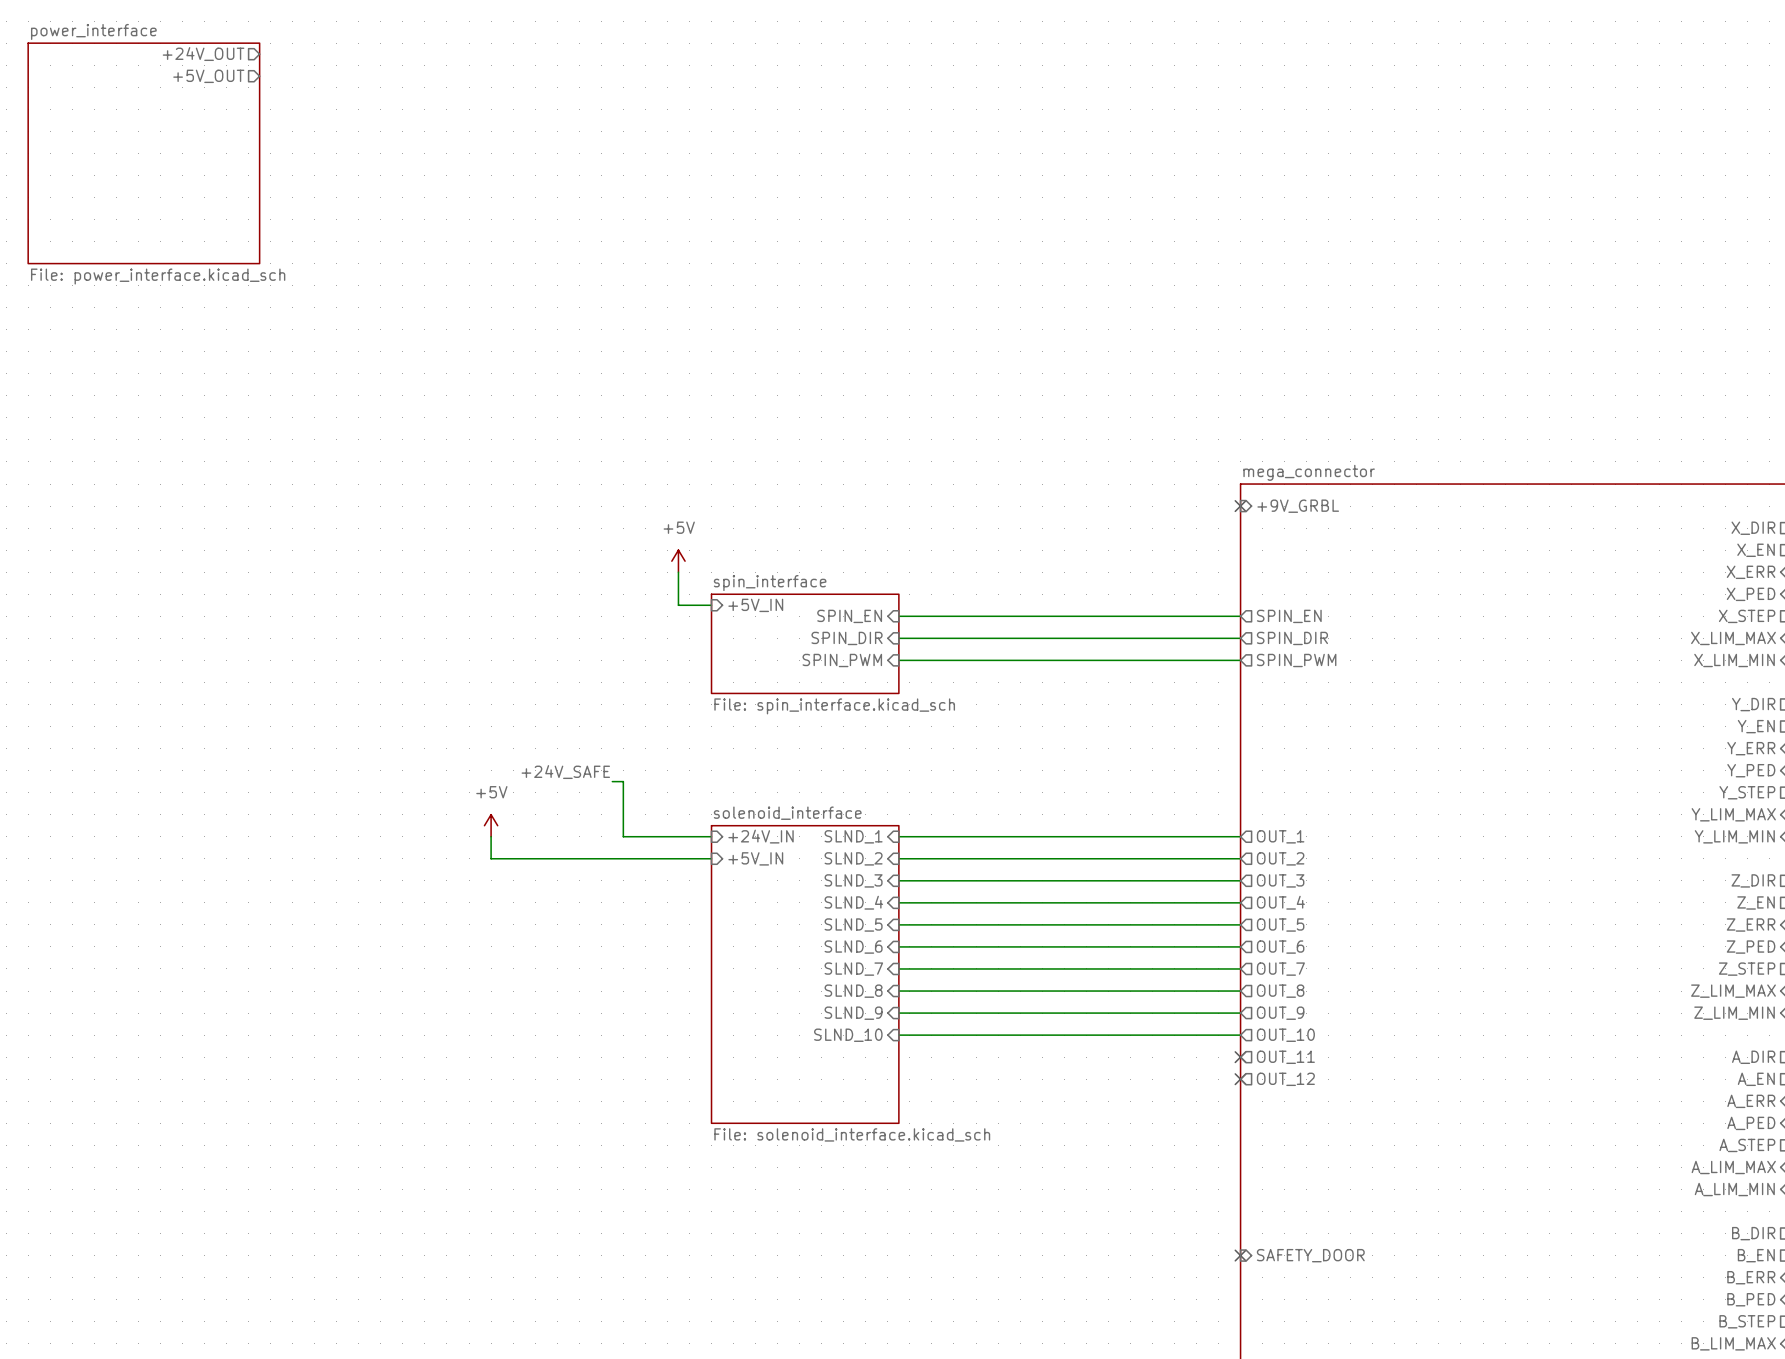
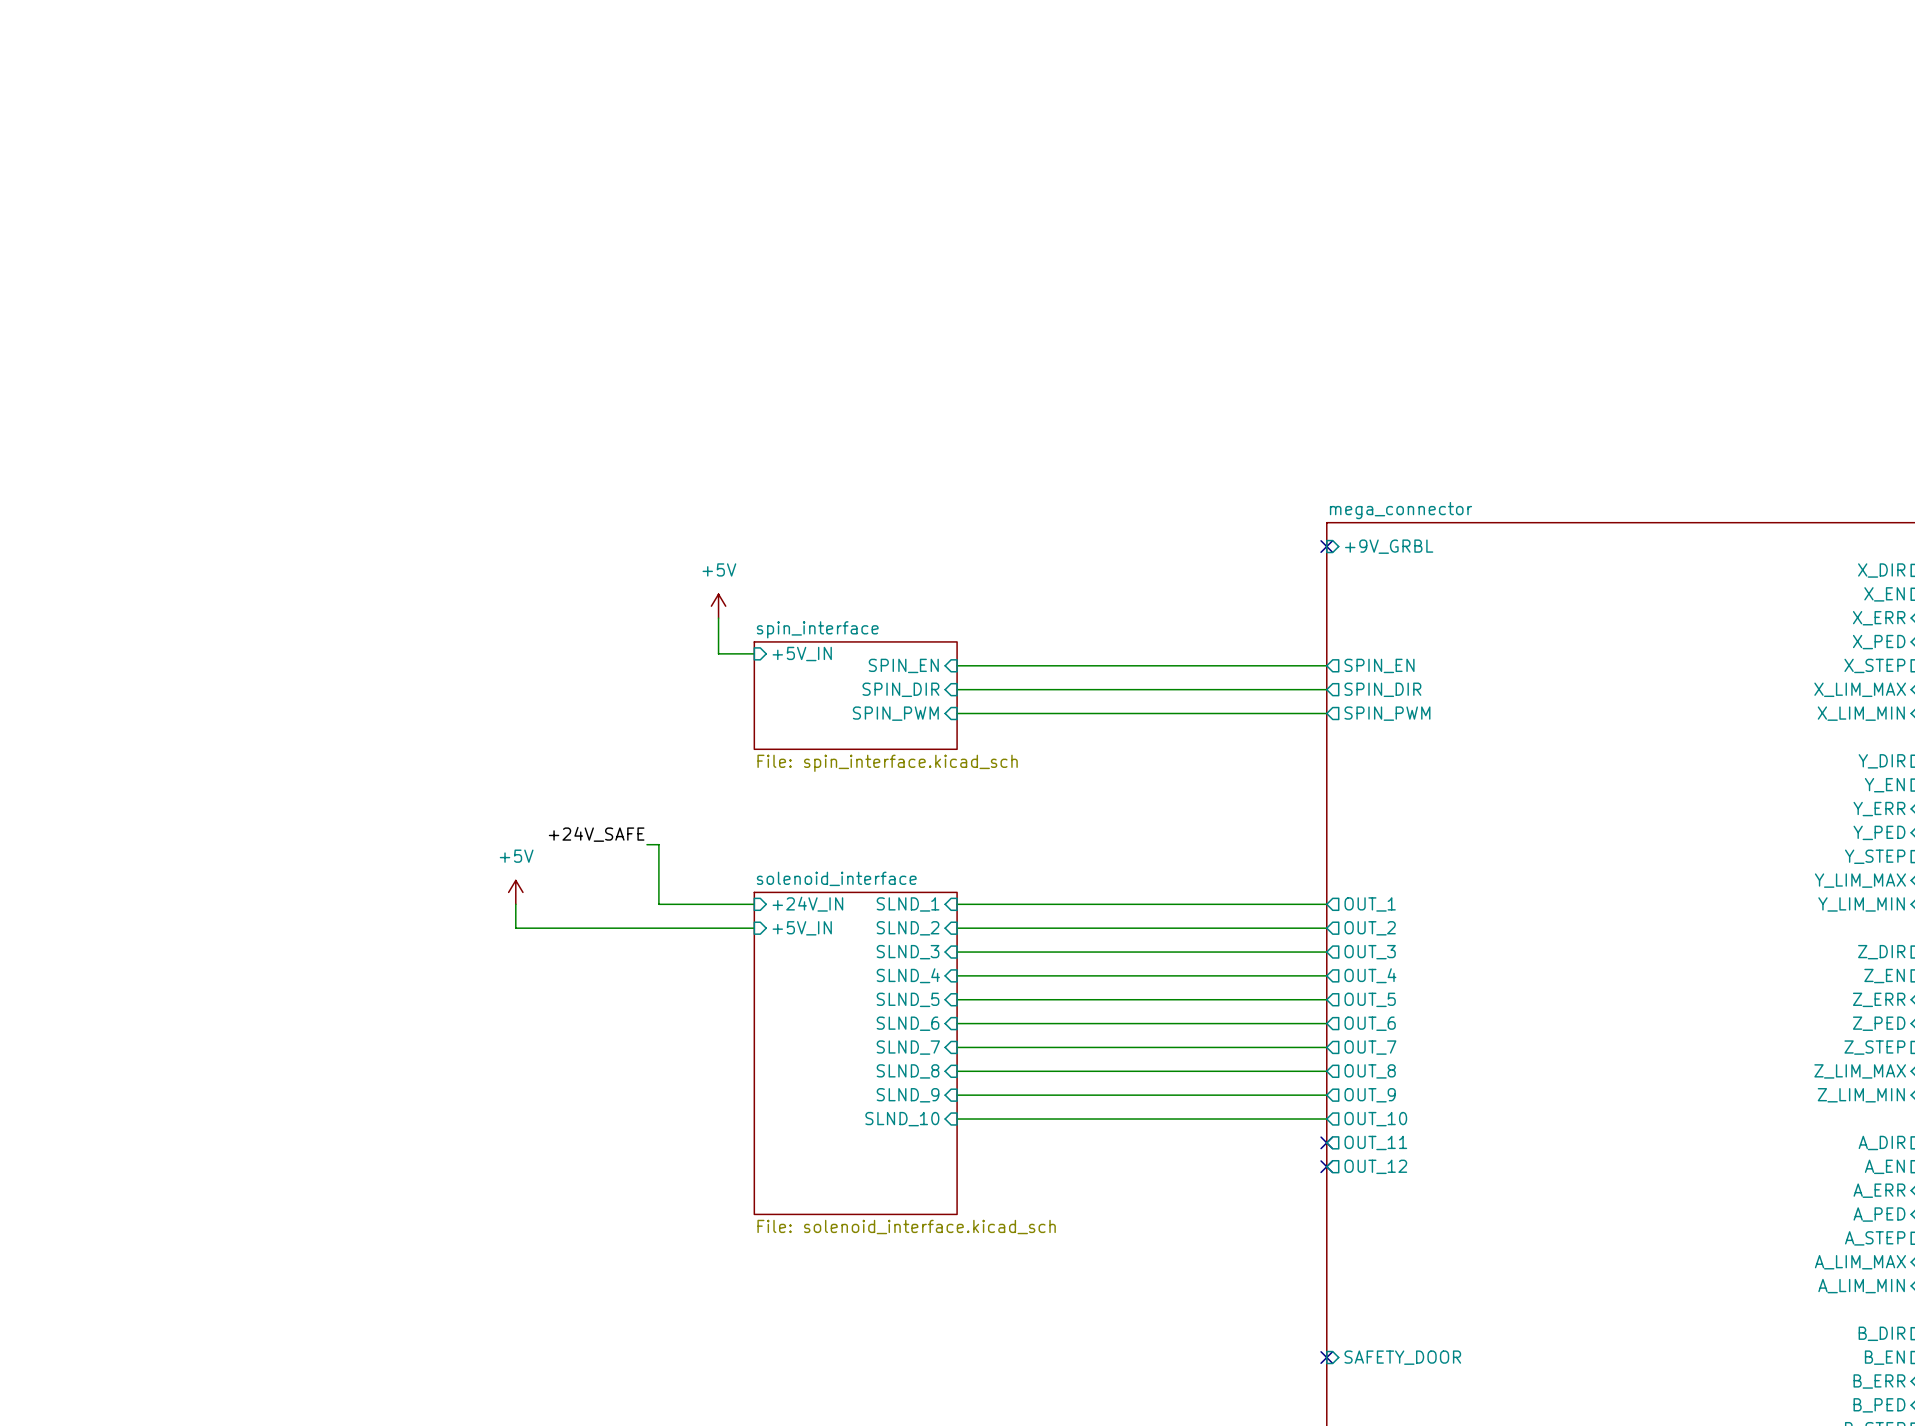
sheet pin: +24V_OUT (203, 54) -> none
sheet pin: +5V_OUT (208, 76) -> none
sheet power_interface: File: power_interface.kicad_sch (143, 153) -> none

